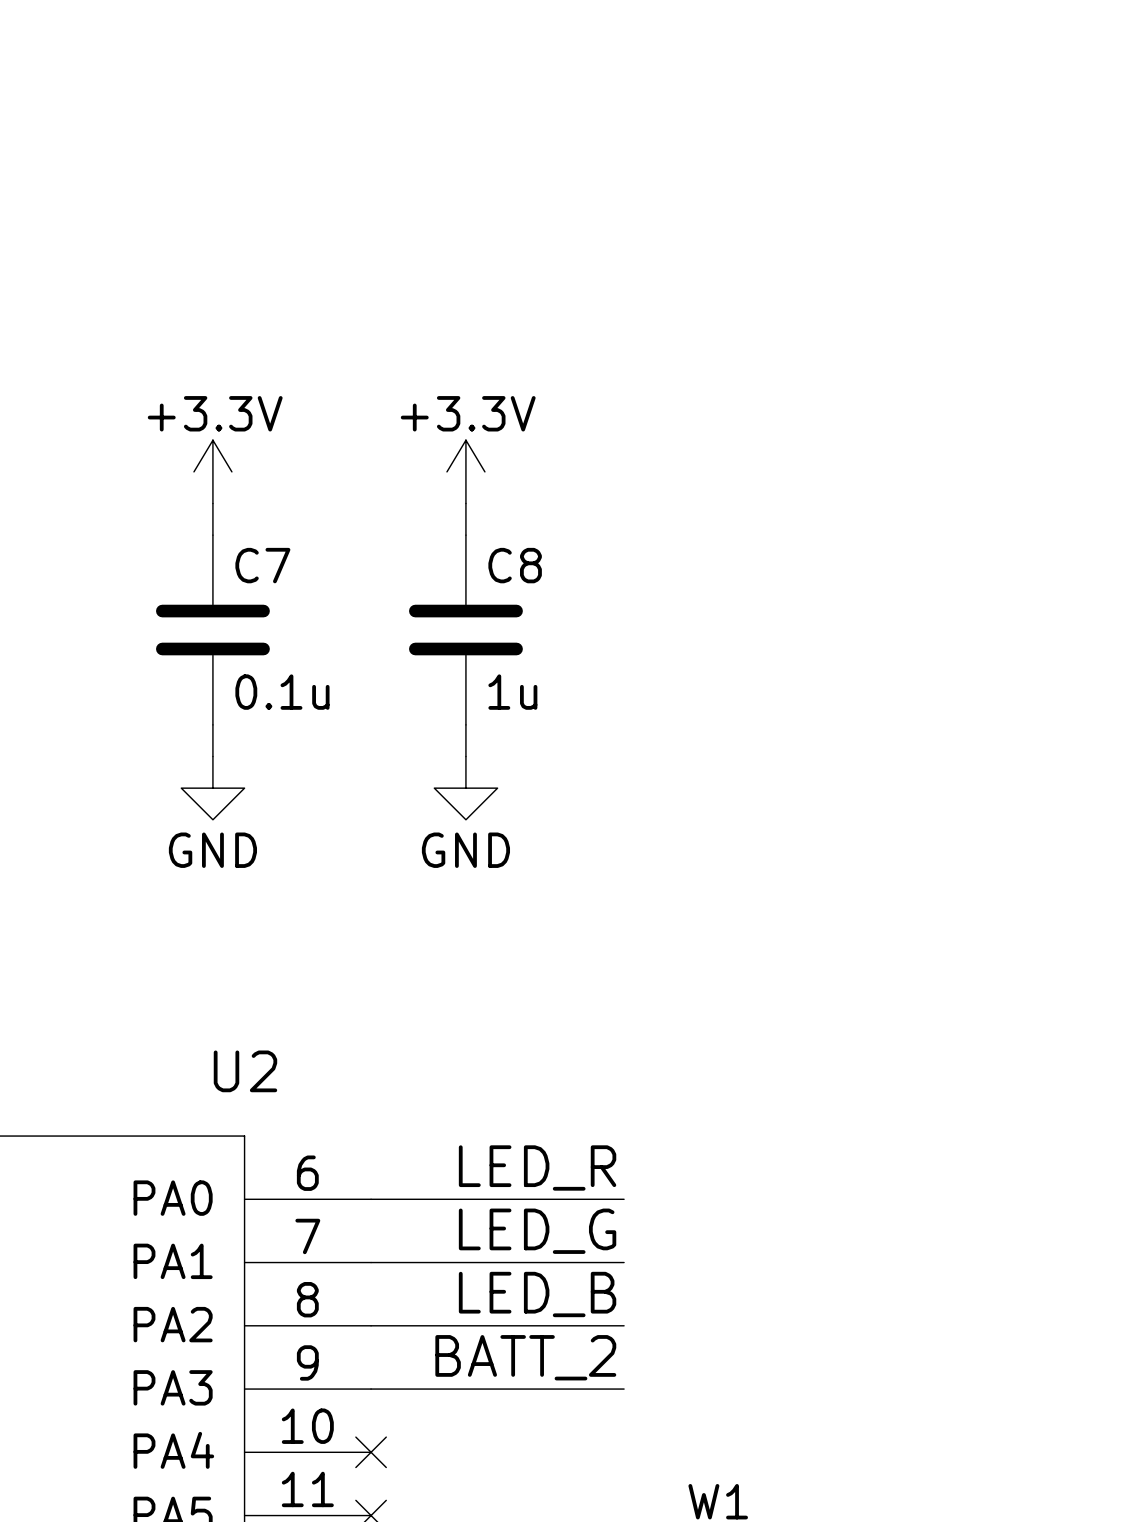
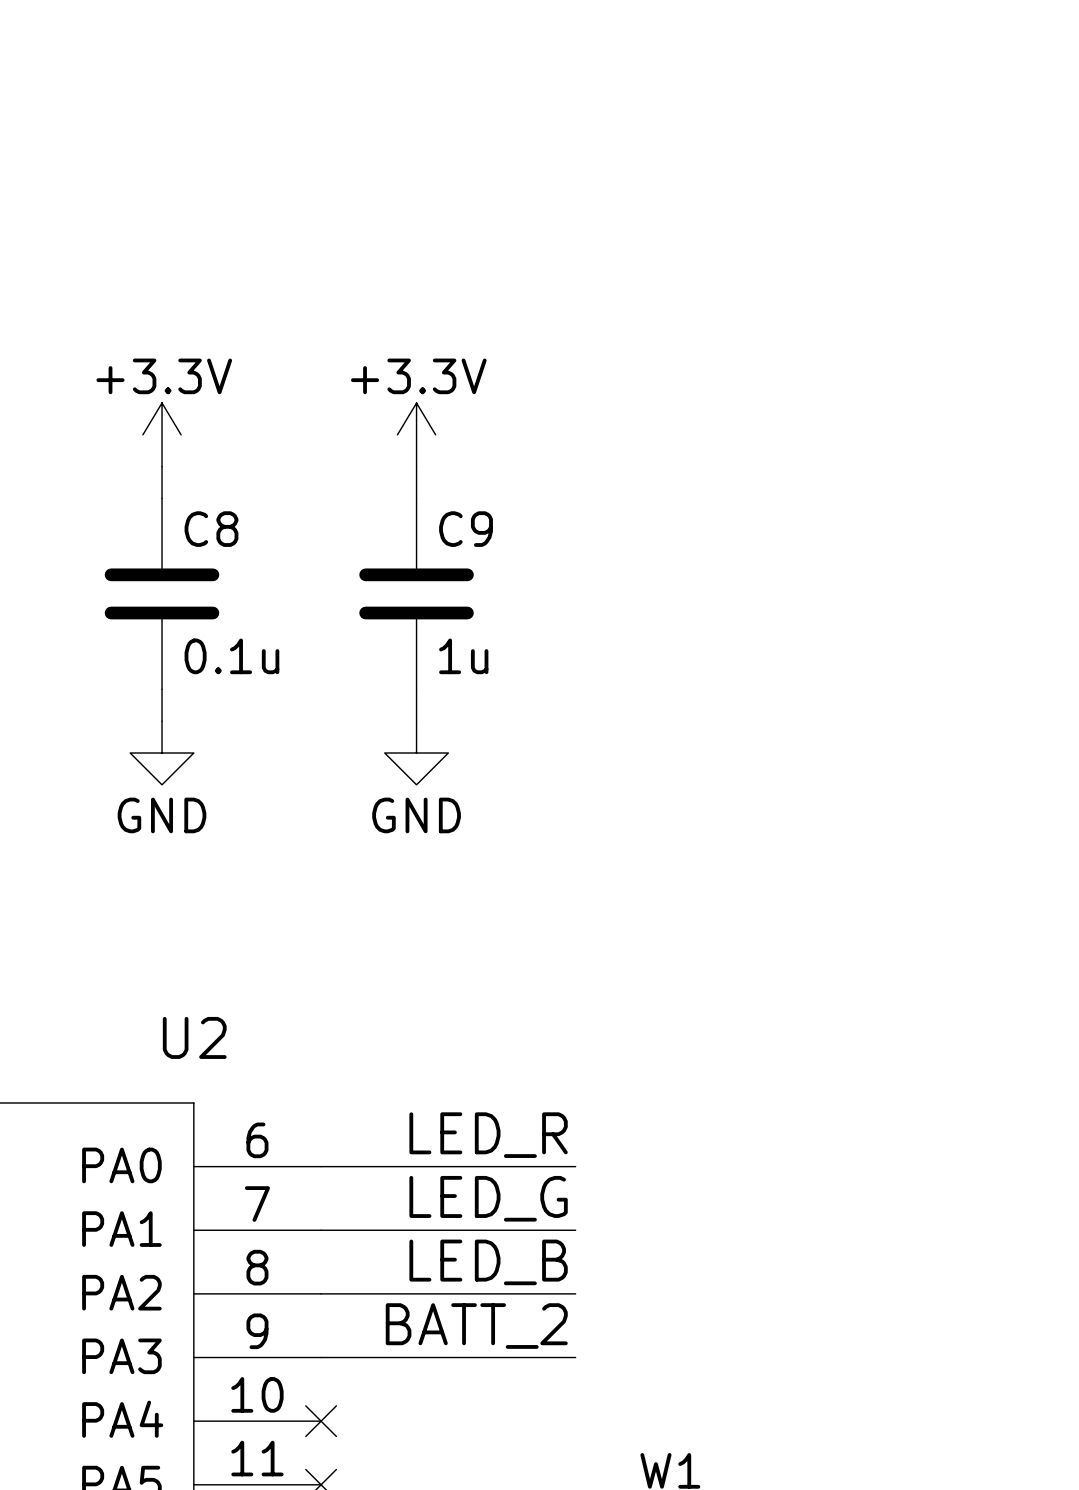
C7 name: C7 (262, 565) -> C8 (211, 529)
C8 name: C8 (515, 565) -> C9 (466, 529)

